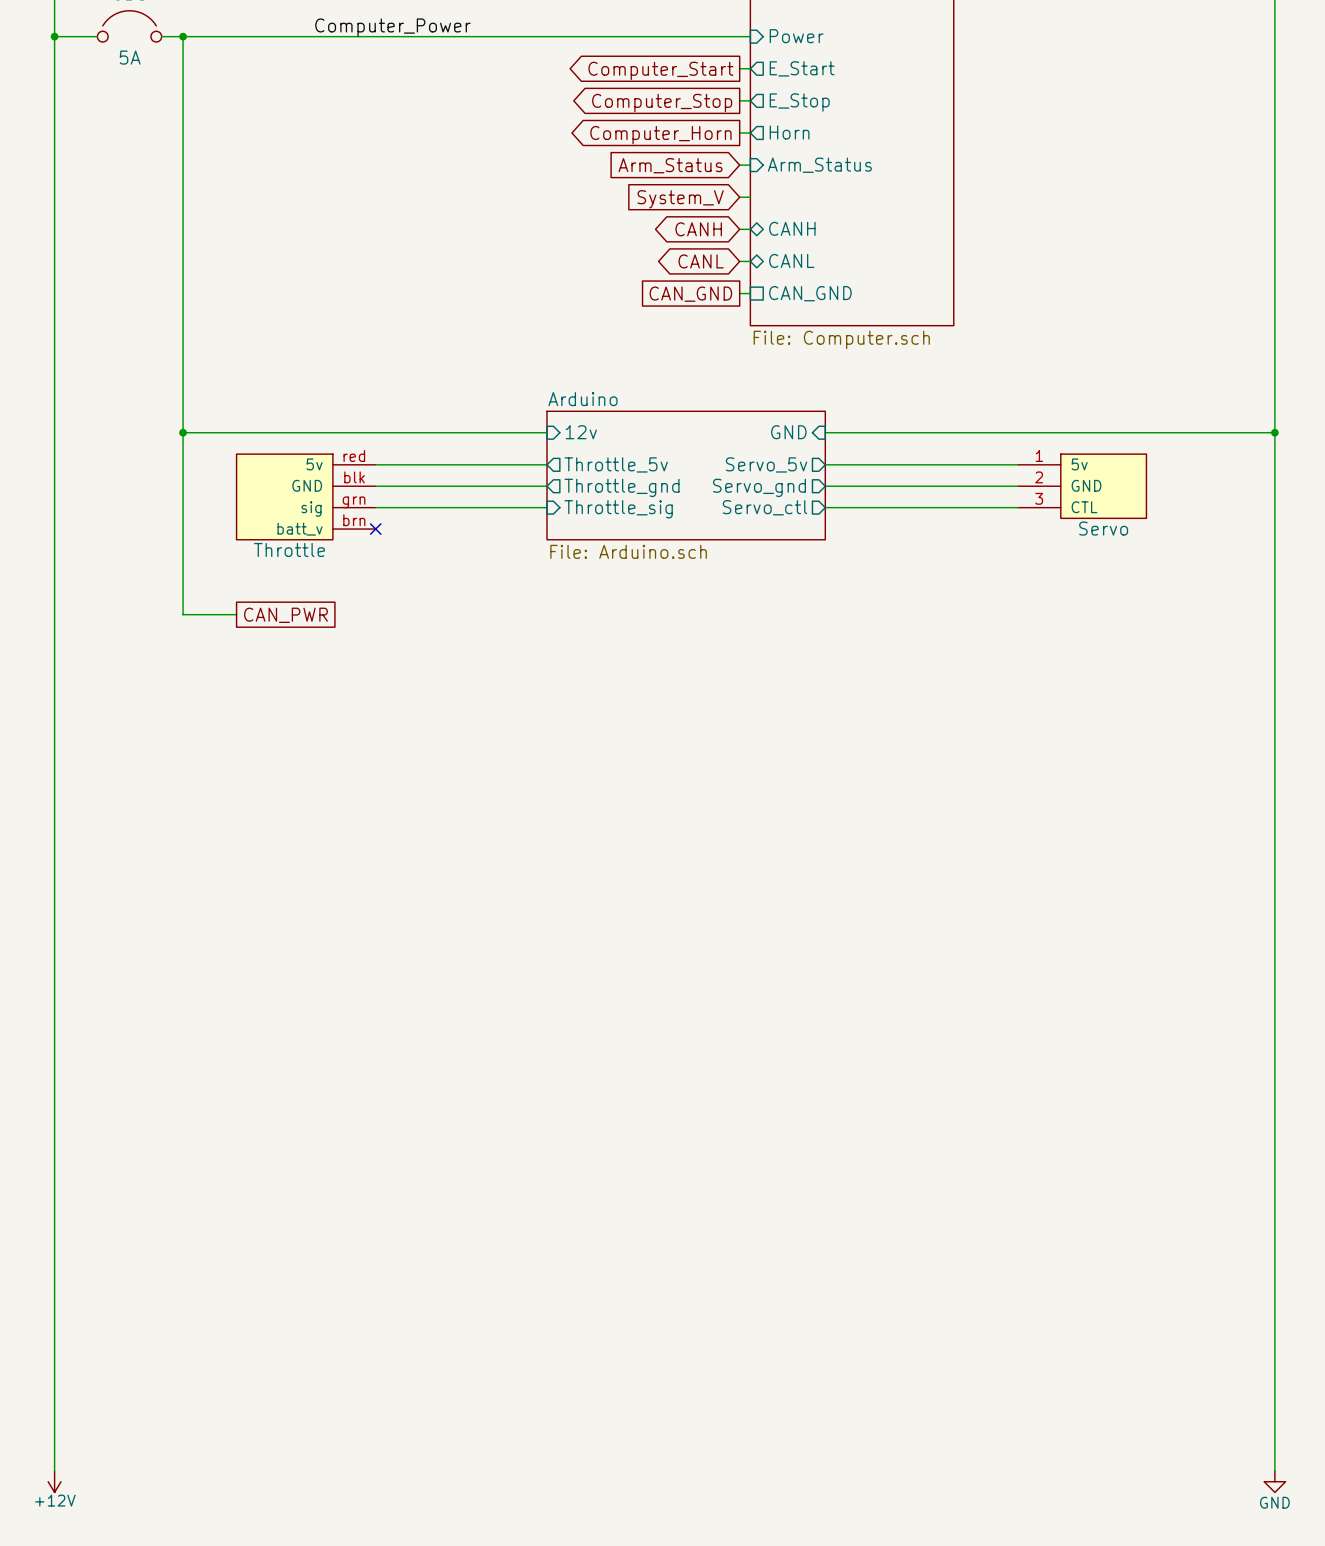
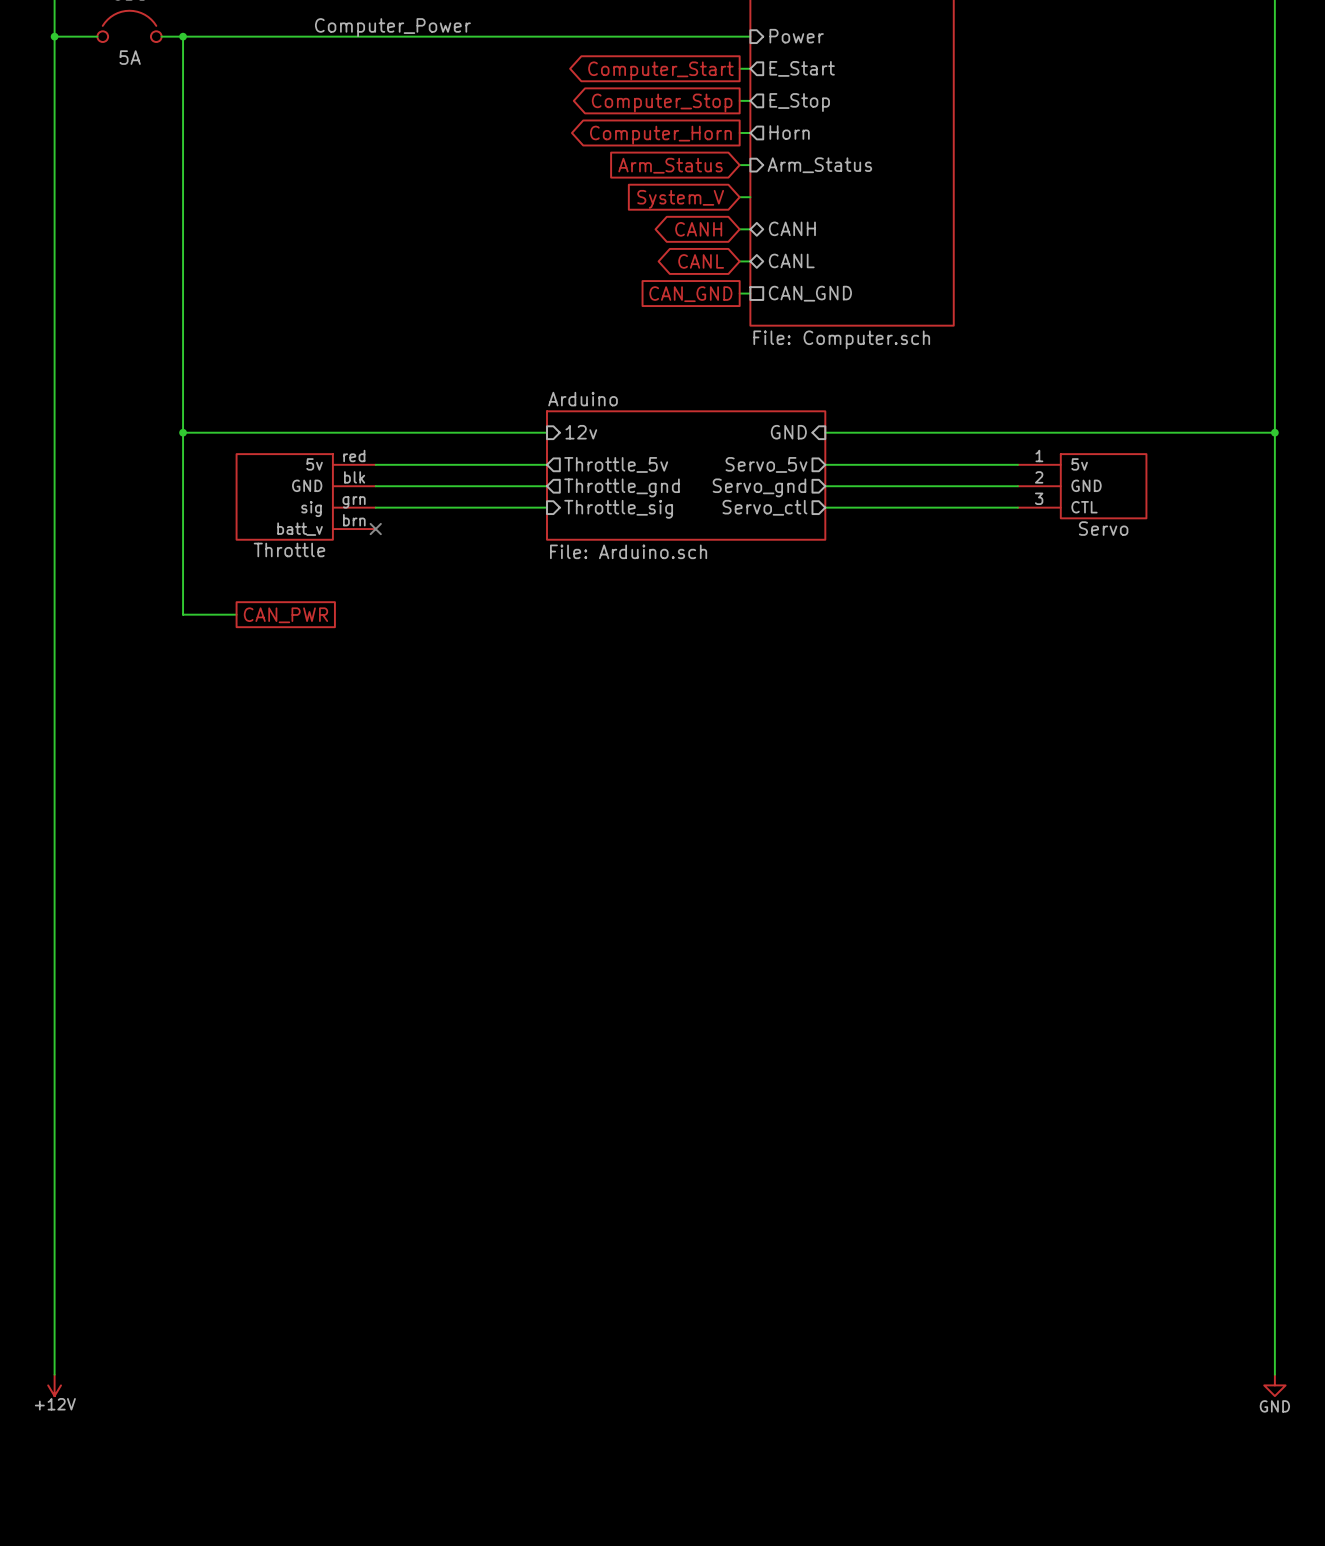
wire: (54, 1374) (54, 1471) -> none
wire: (1274, 1374) (1274, 1471) -> none
power symbol position: +12V (54, 1481) -> +12V (54, 1385)
power symbol position: GND (1274, 1481) -> GND (1274, 1385)

